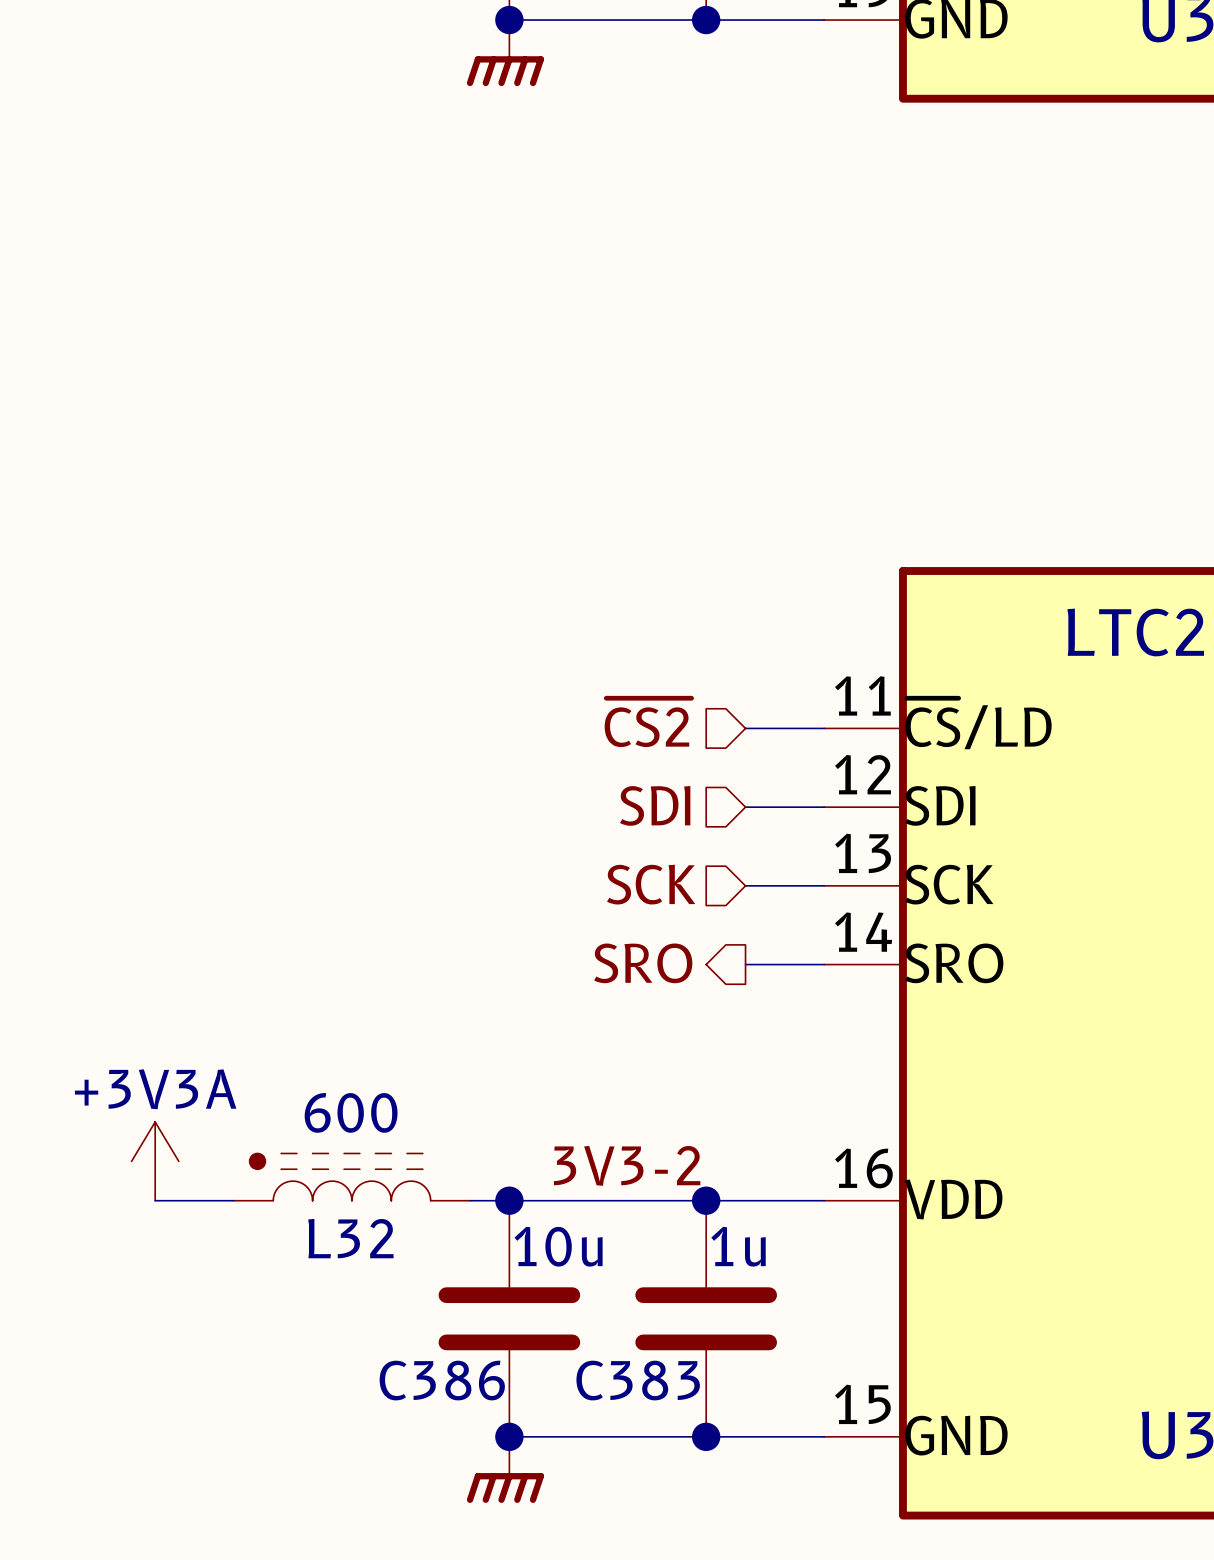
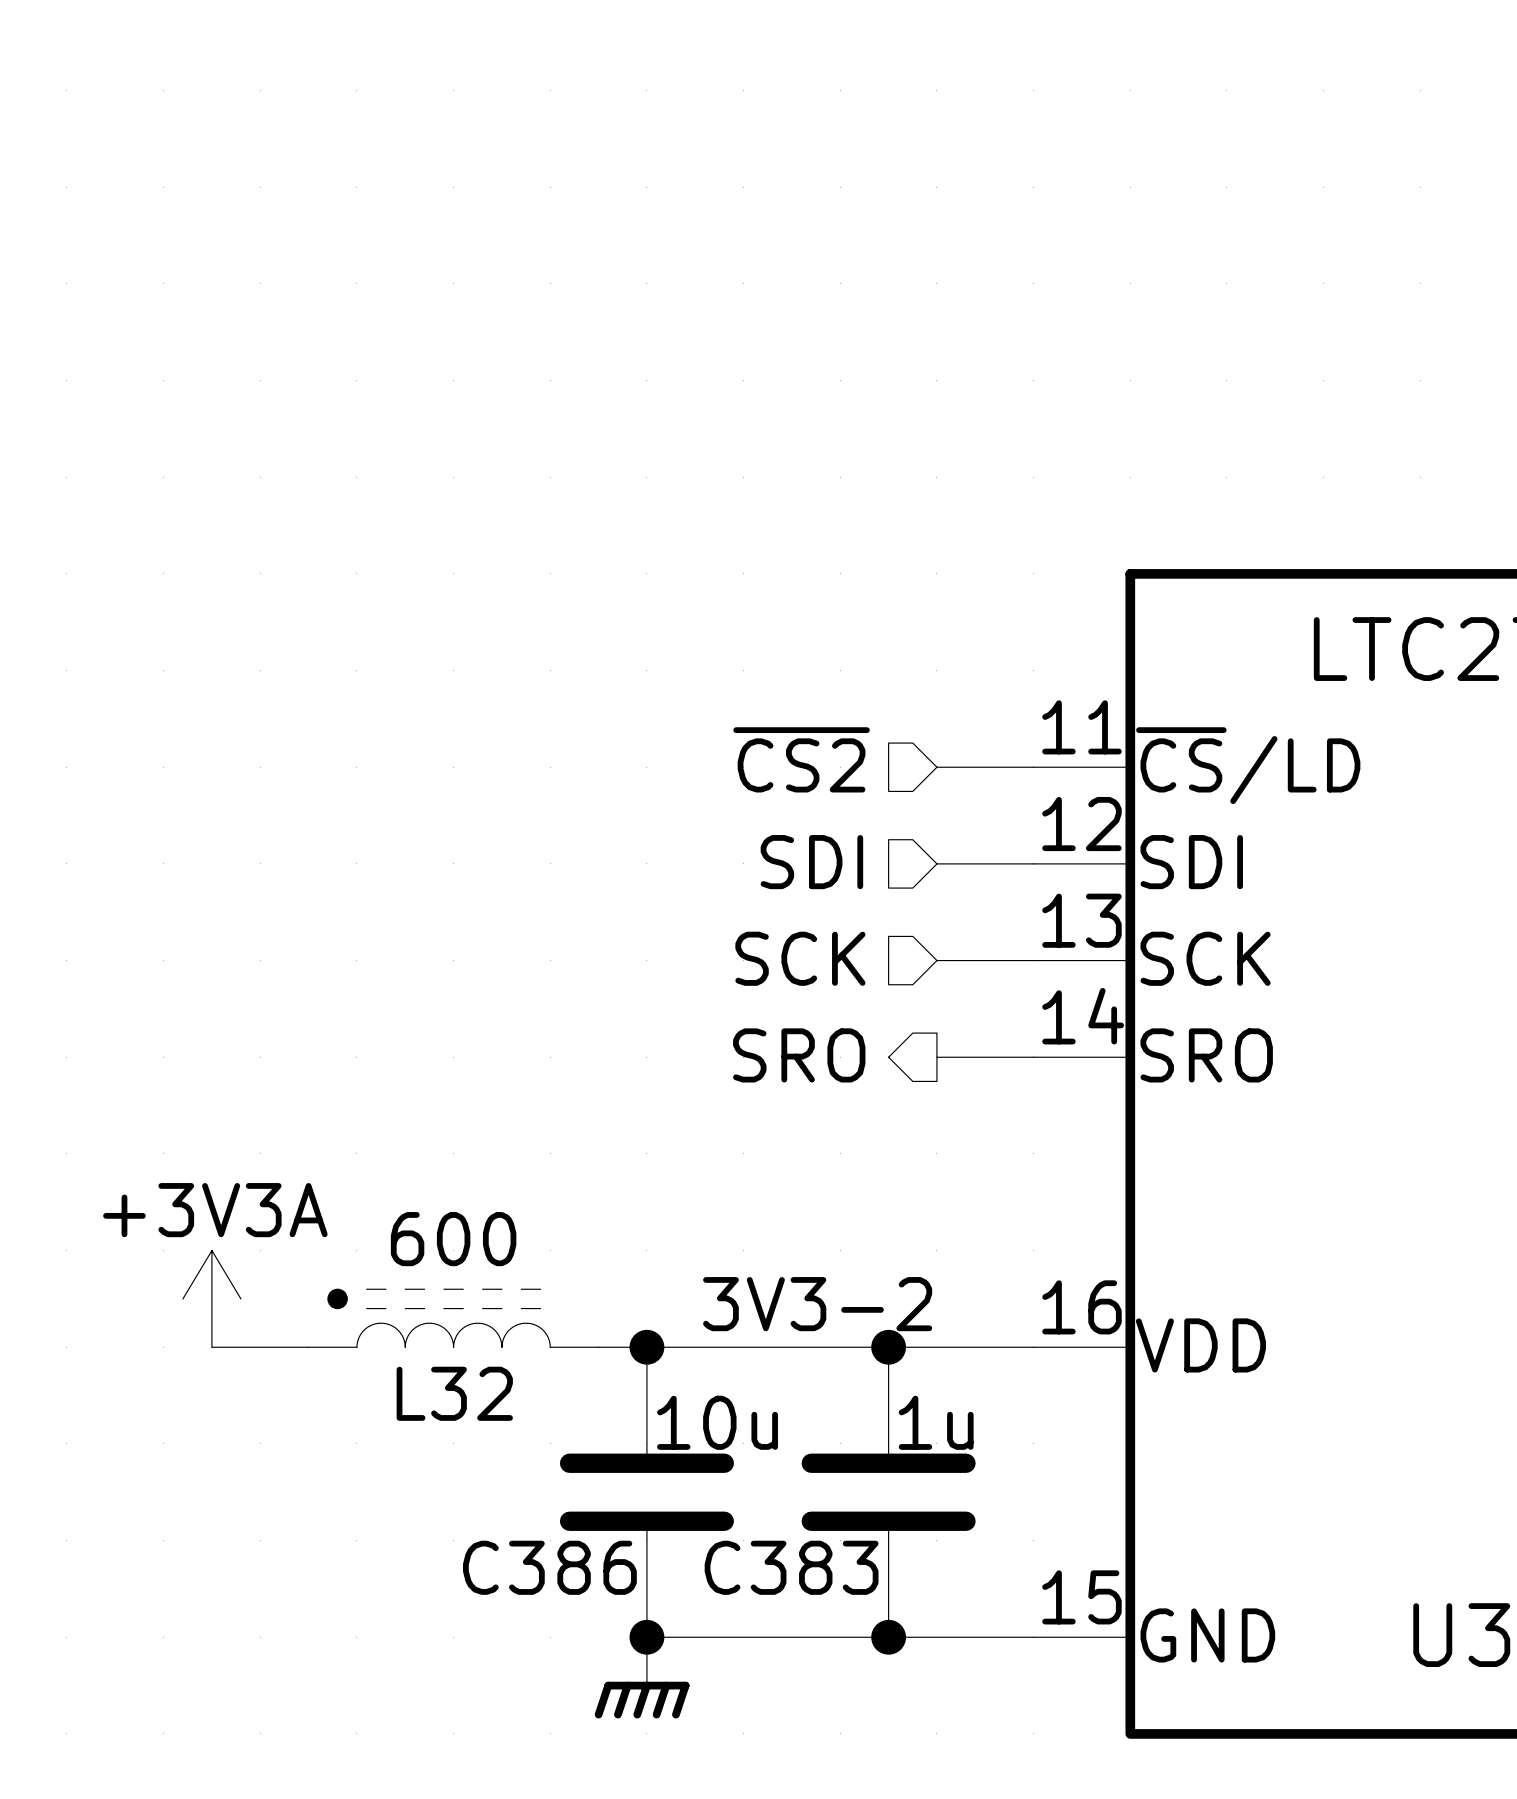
C386 value position: 10u (558, 1246) -> 10u (717, 1422)
C383 value position: 1u (738, 1246) -> 1u (936, 1422)

